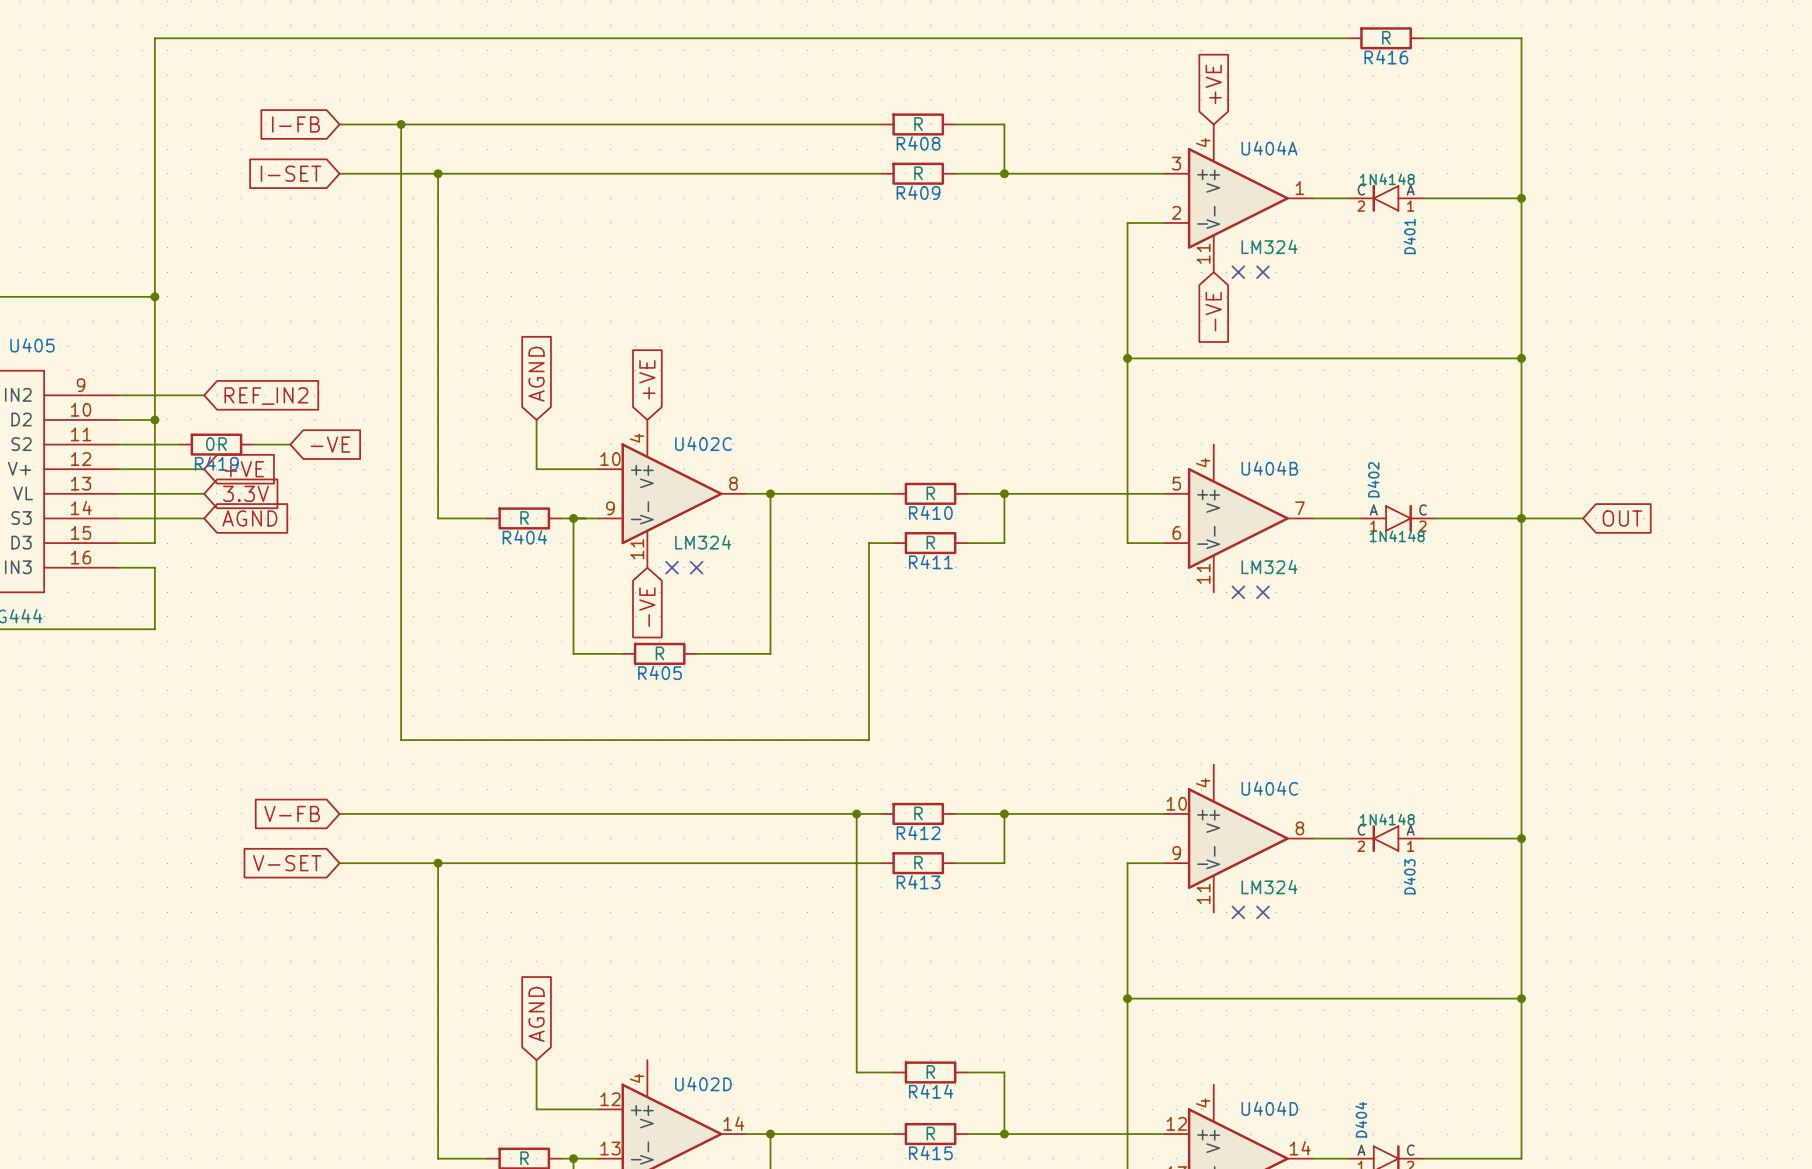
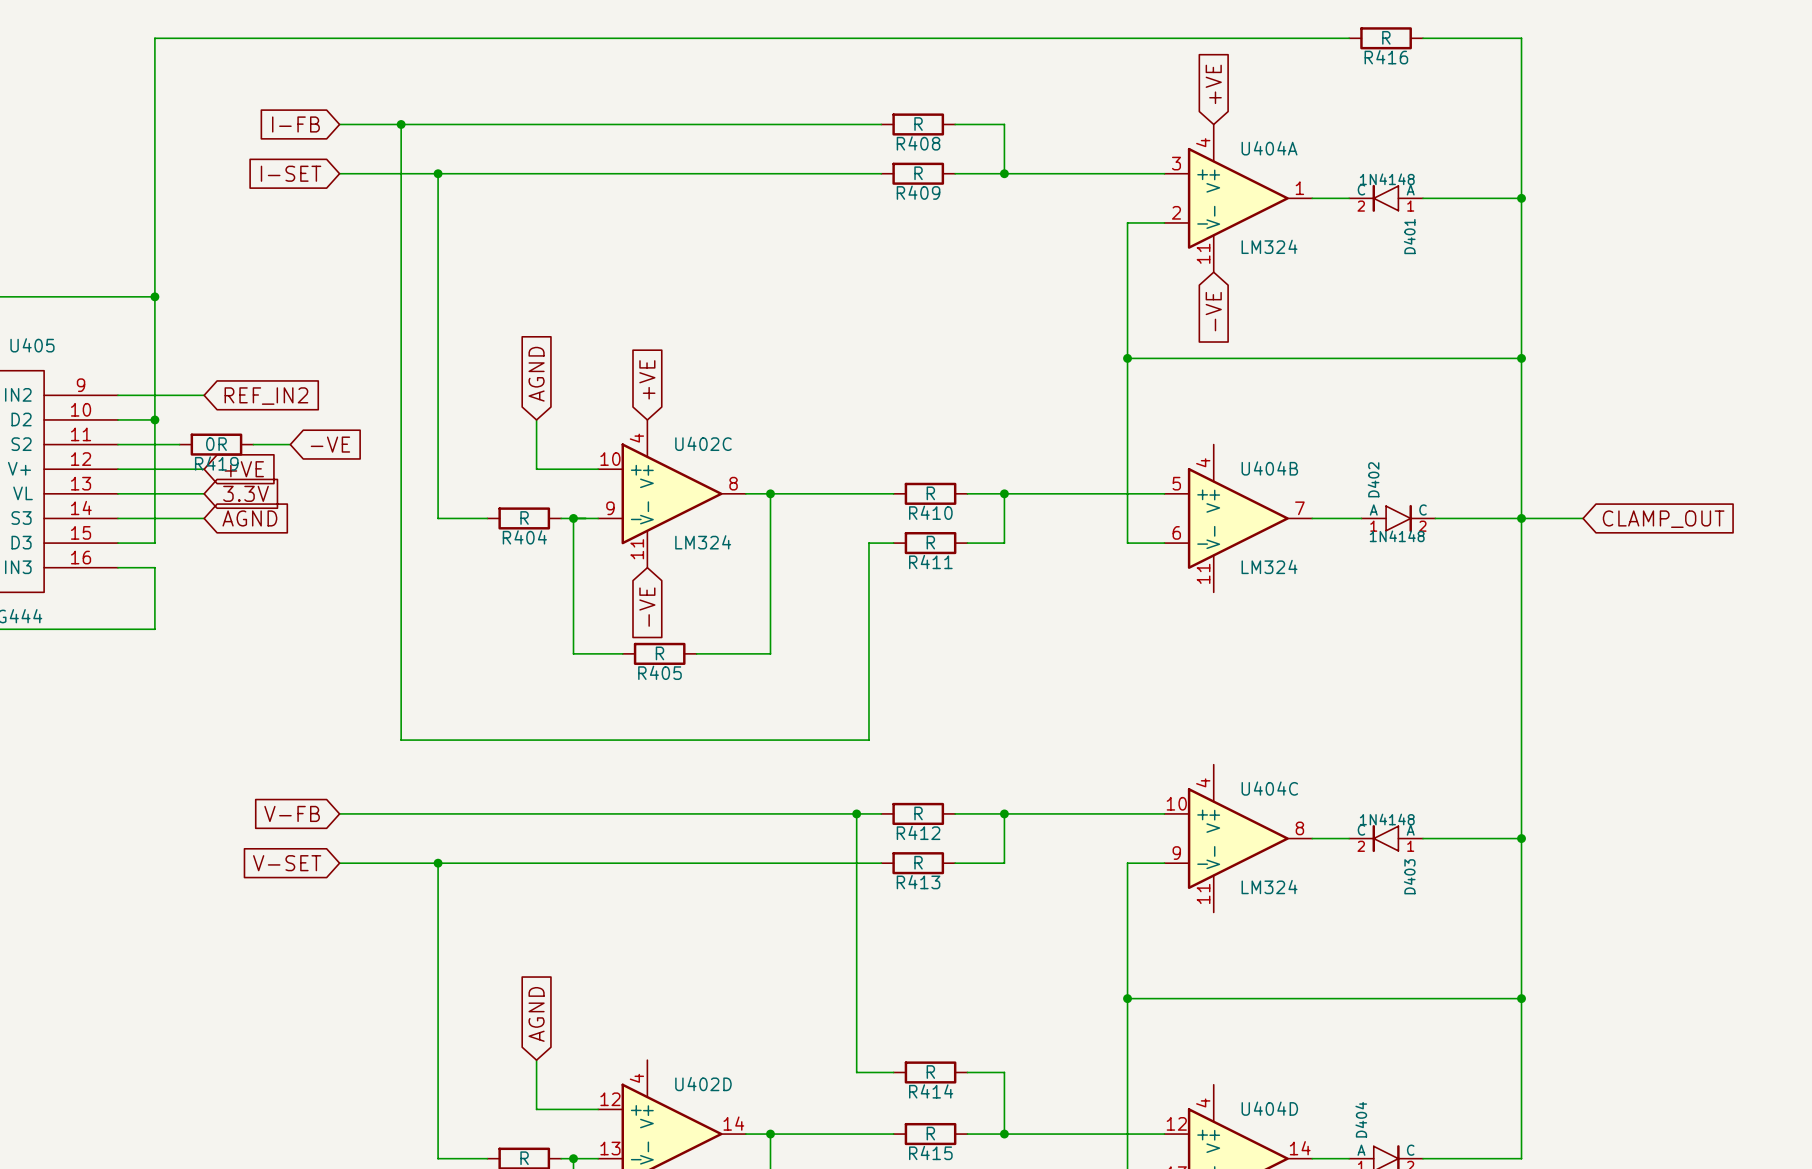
no-connect mark: (1238, 272) -> none
no-connect mark: (1262, 272) -> none
global label: OUT (1622, 518) -> CLAMP_OUT (1663, 519)
no-connect mark: (672, 567) -> none
no-connect mark: (696, 567) -> none
no-connect mark: (1238, 592) -> none
no-connect mark: (1262, 592) -> none
no-connect mark: (1238, 912) -> none
no-connect mark: (1262, 912) -> none

